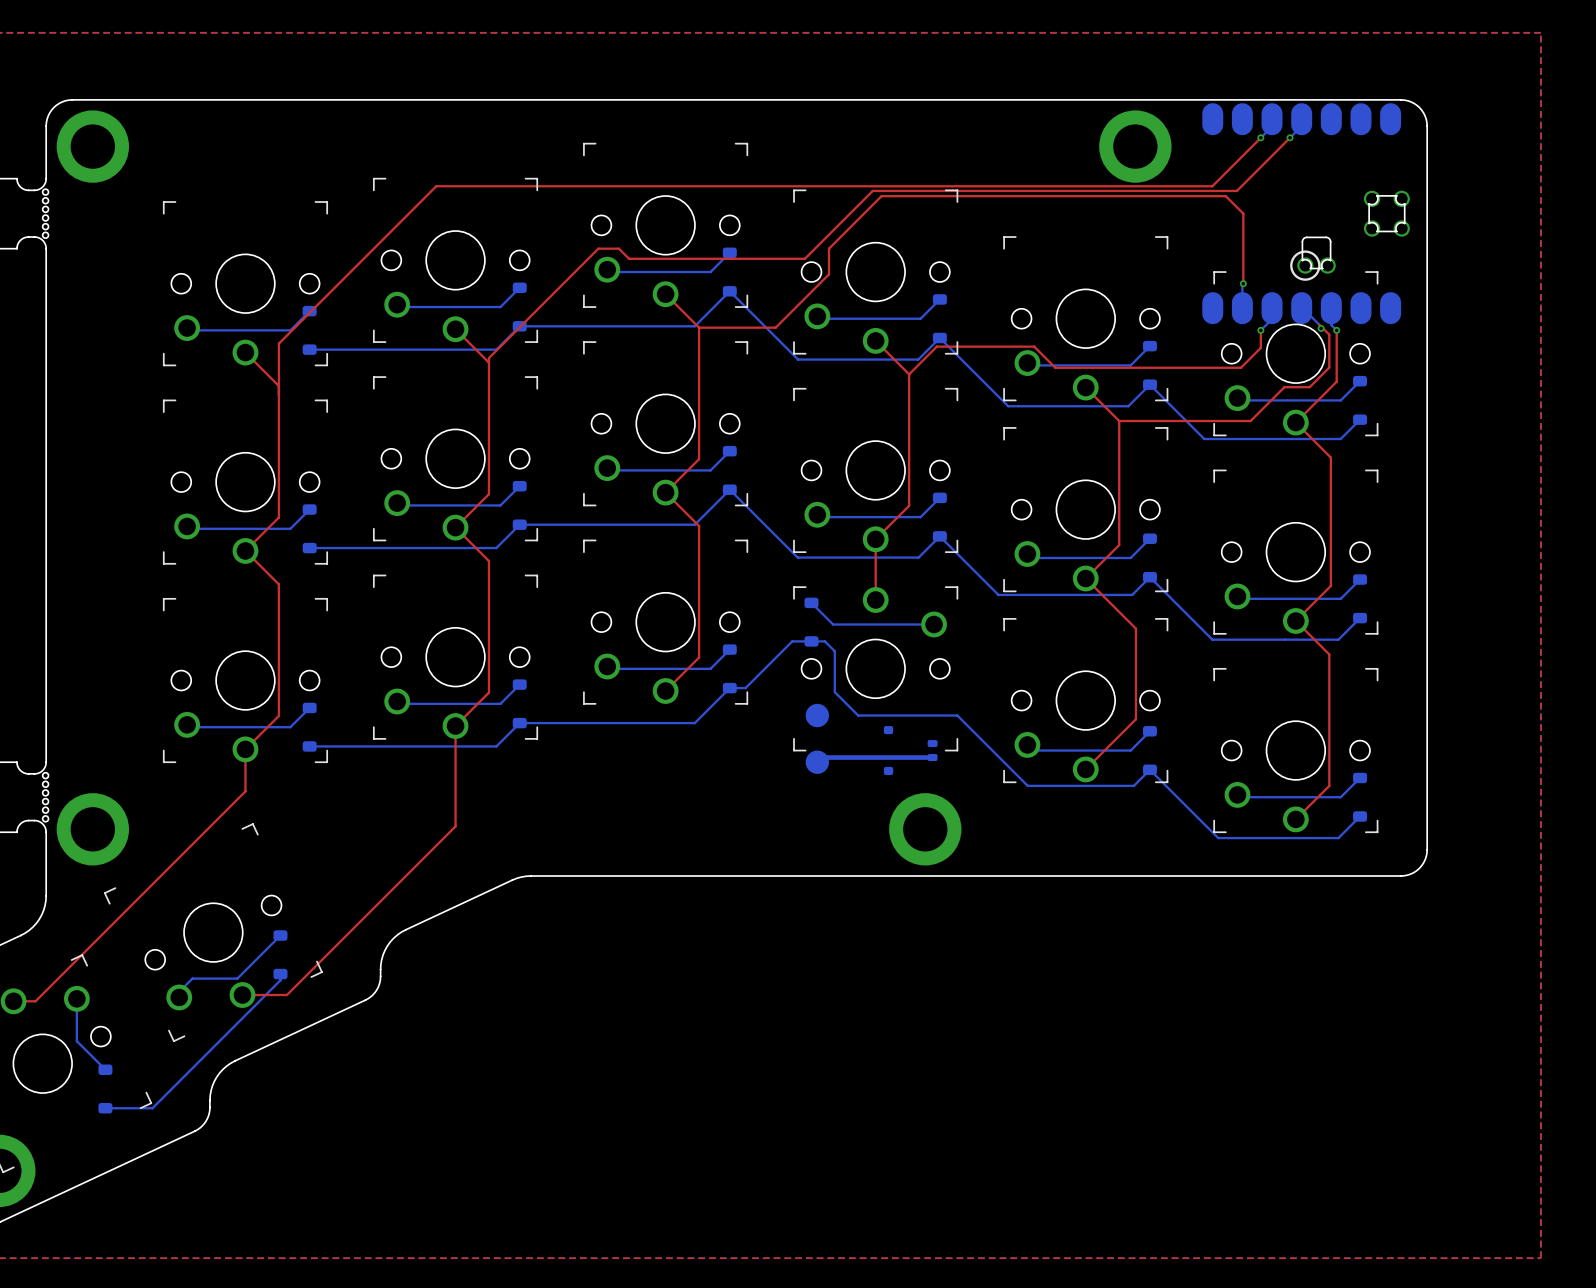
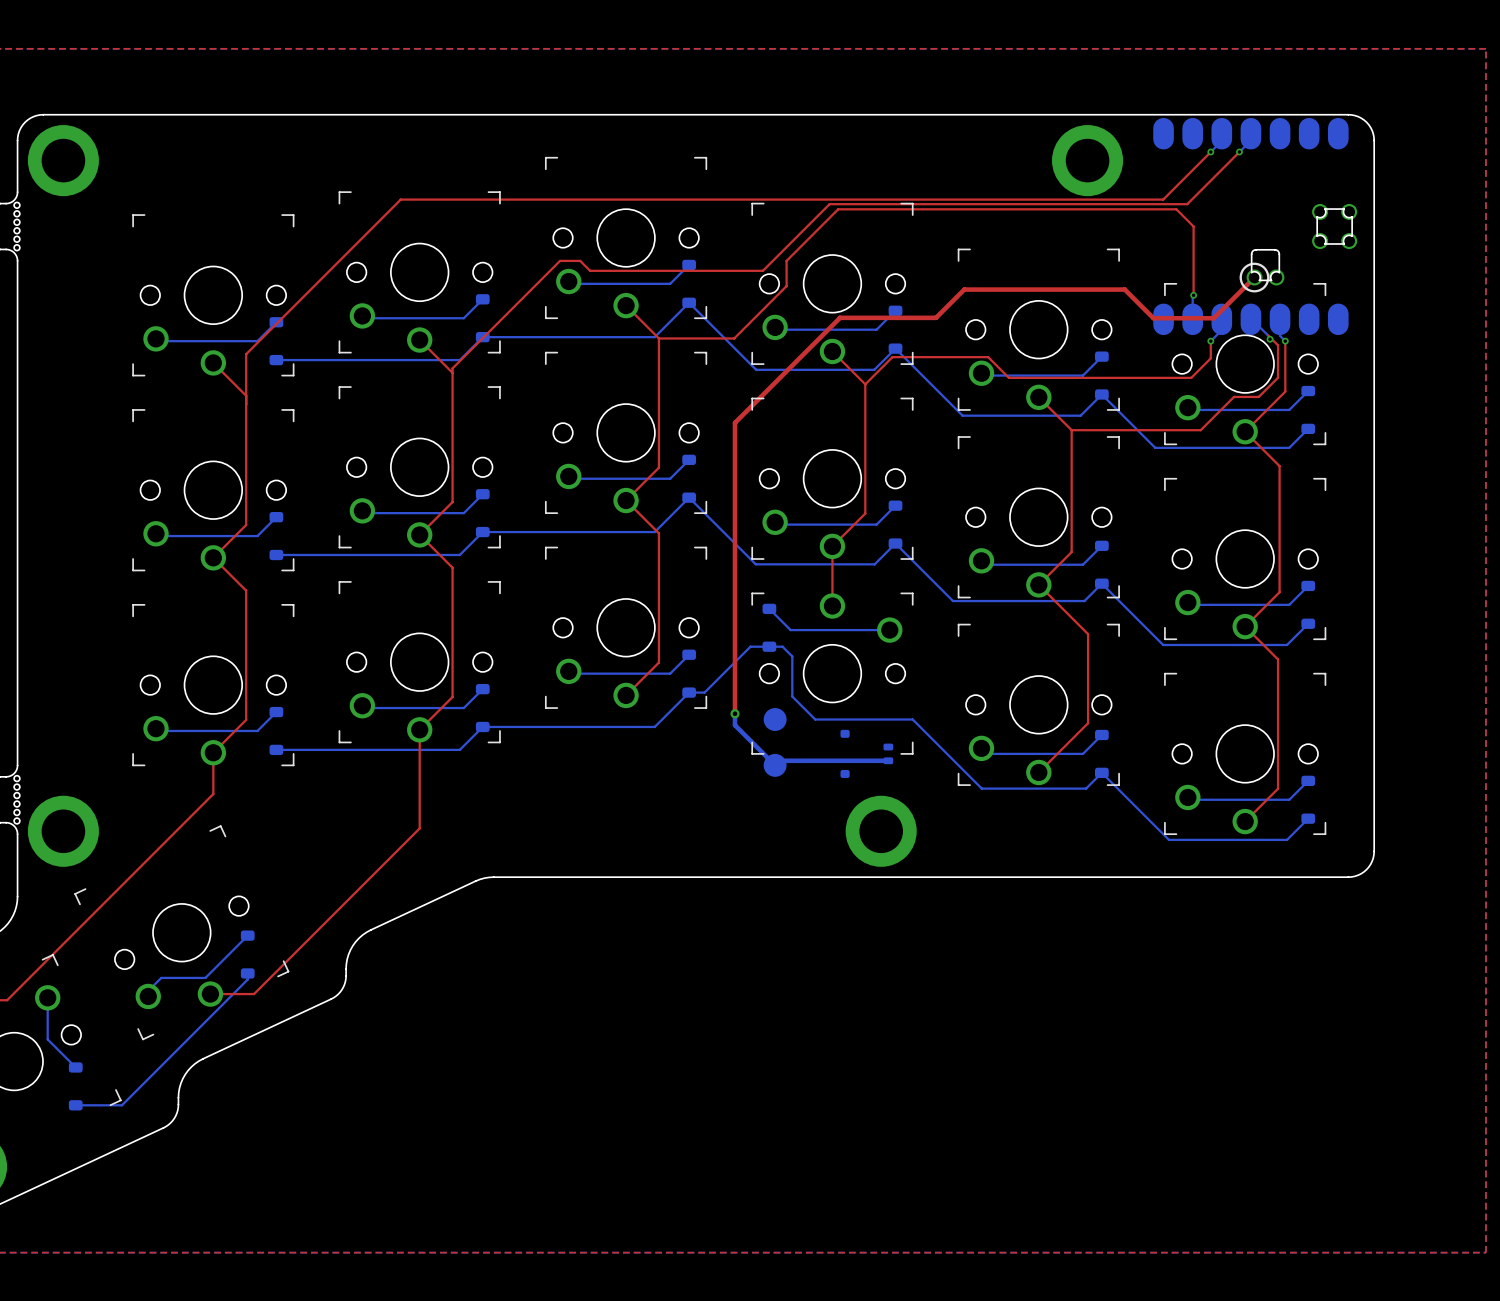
top track: none -> (1251, 280) (1213, 318) (1153, 318) (1124, 289) (964, 289) (936, 317) (840, 317) (735, 422) (735, 713)
bottom track: none -> (735, 713) (735, 725) (775, 765)
via: none -> (735, 713)

